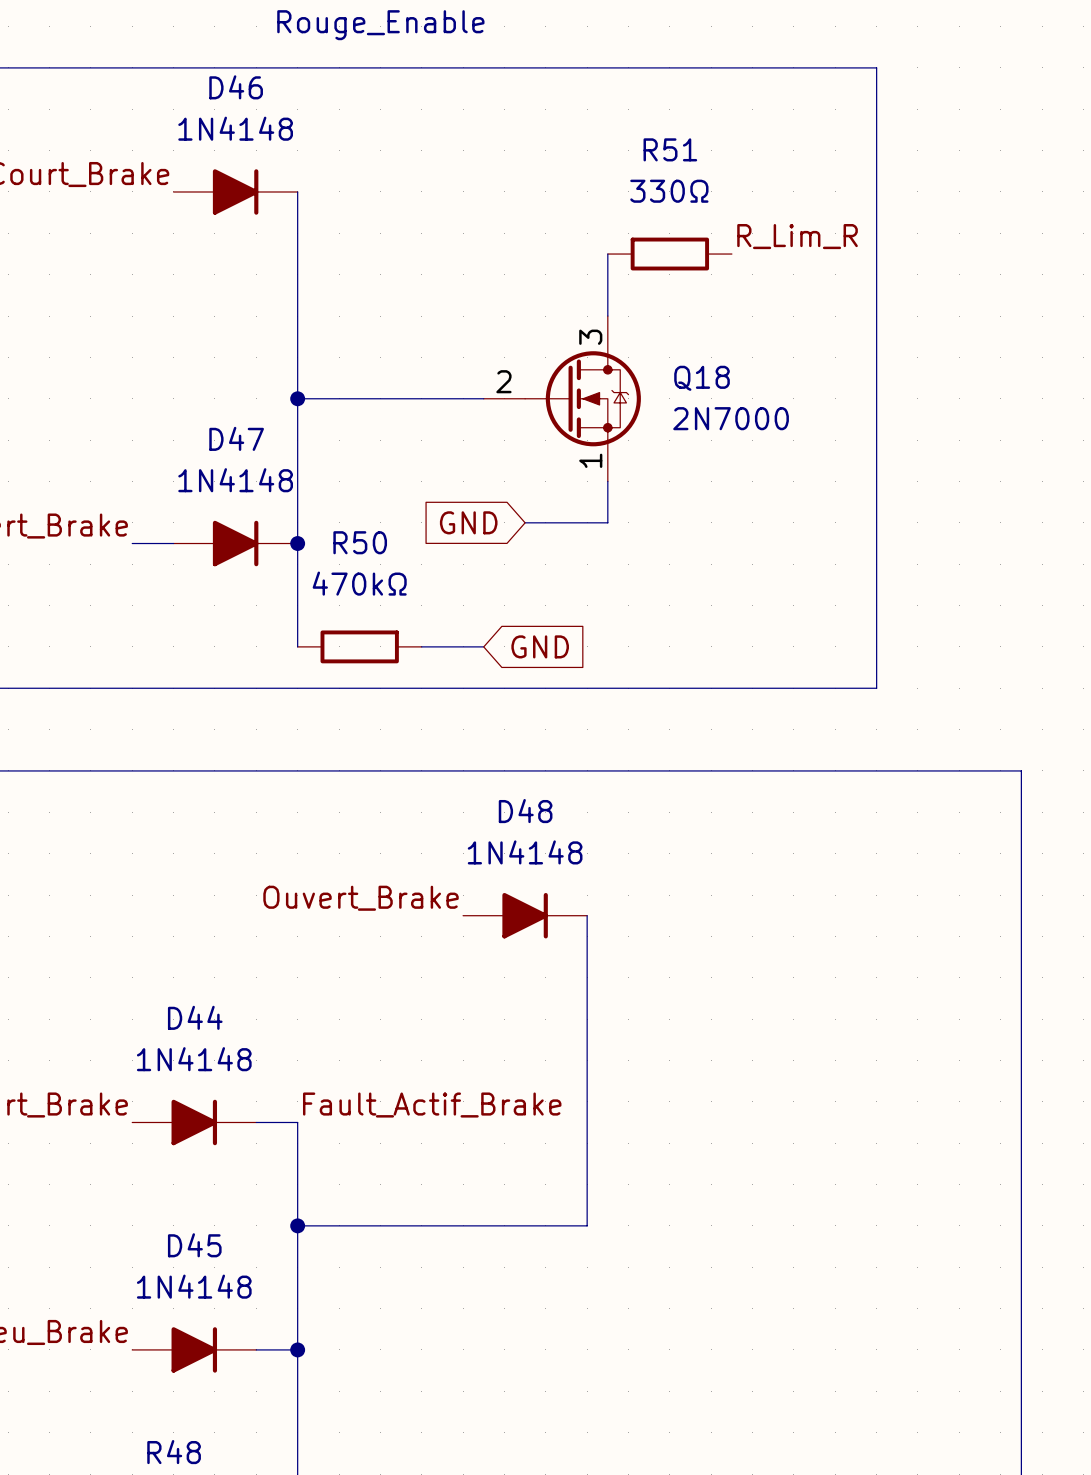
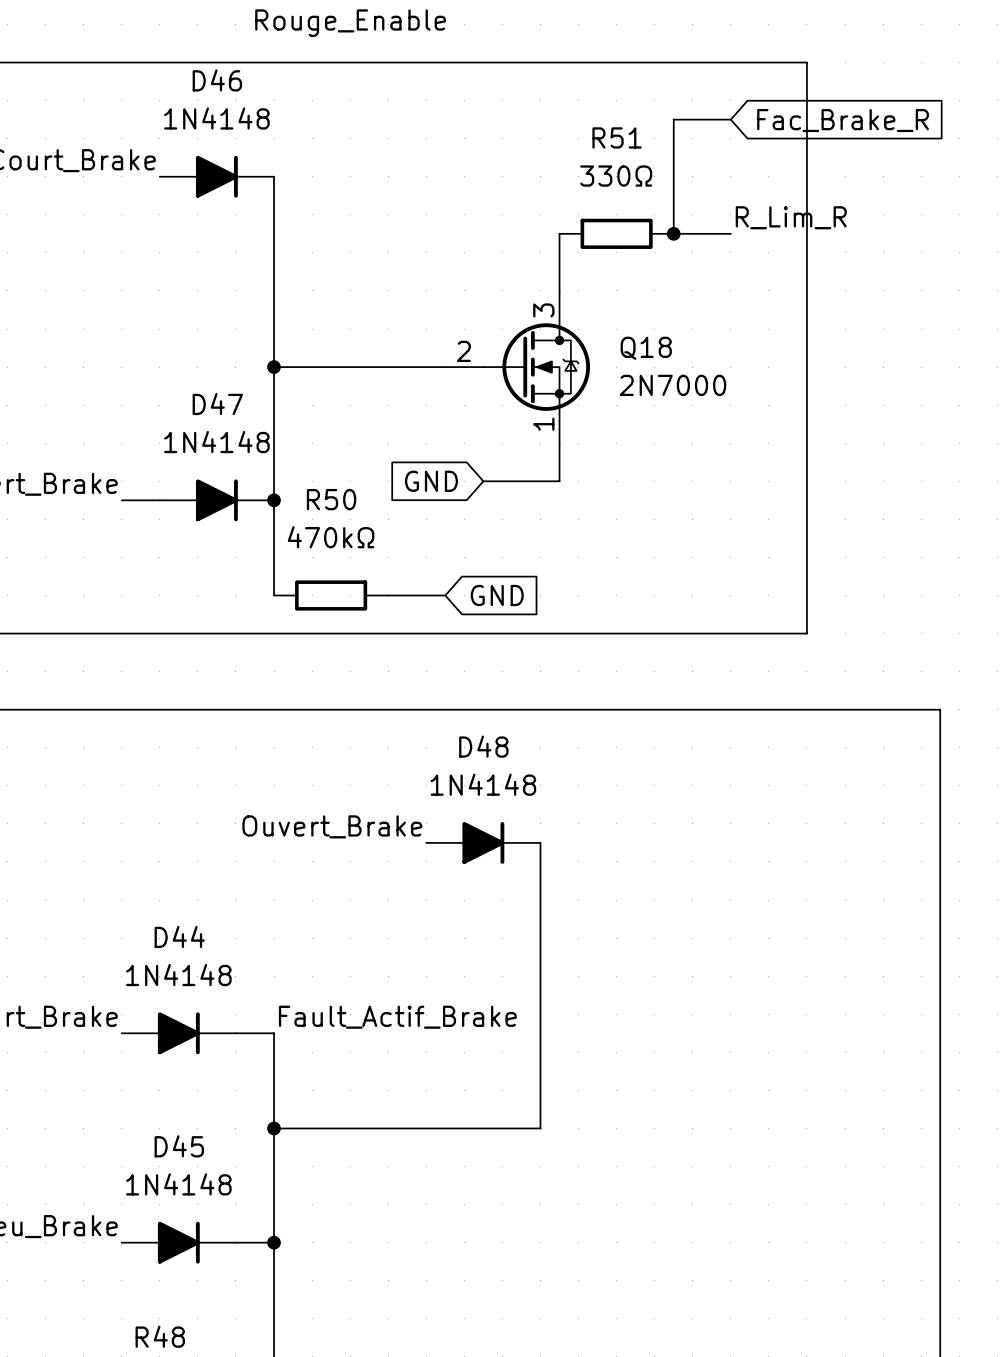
wire: none -> (730, 119) (673, 119) (673, 233) (730, 233)
global label: none -> Fac_Brake_R (843, 120)
label position: R_Lim_R (797, 236) -> R_Lim_R (791, 217)
junction: none -> (673, 233)

